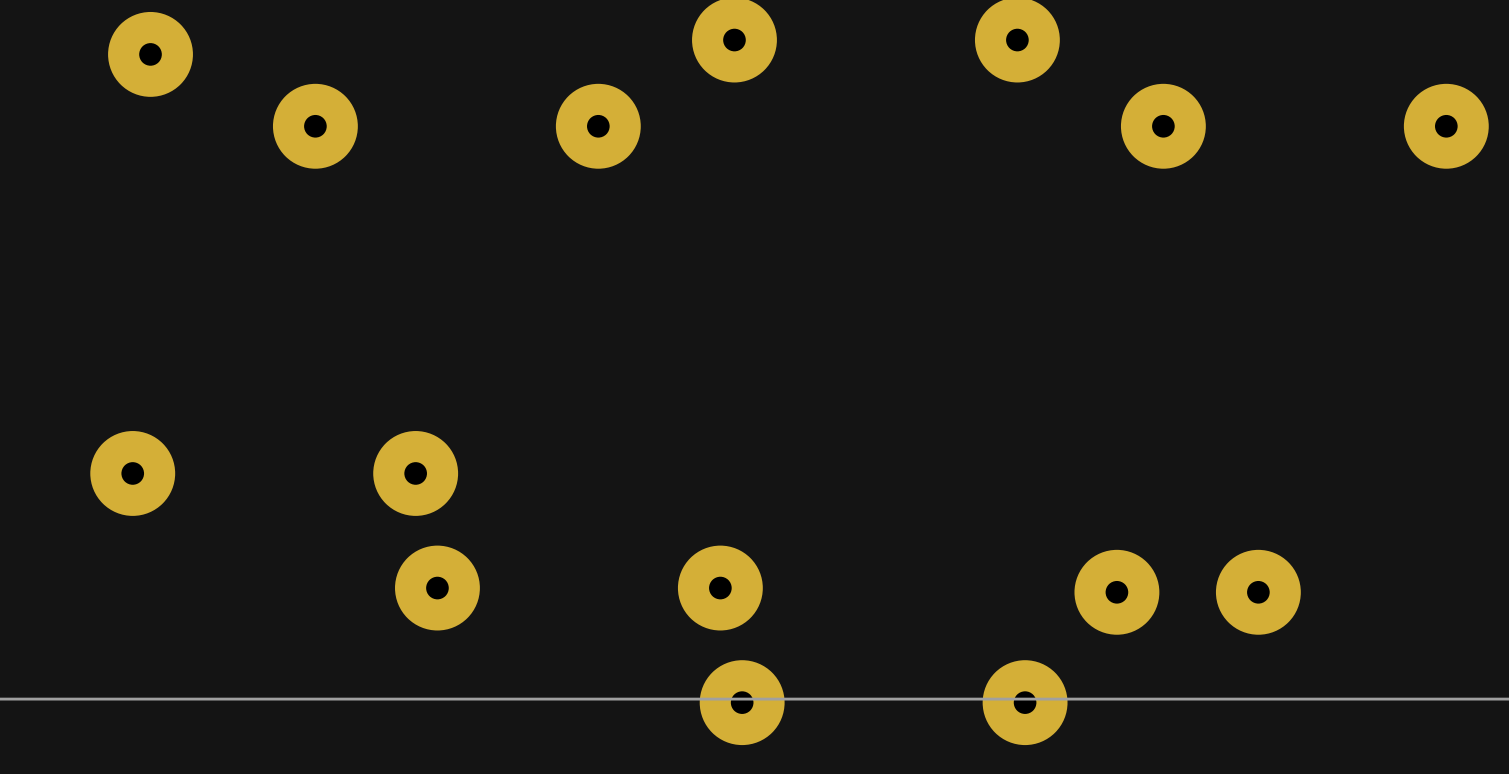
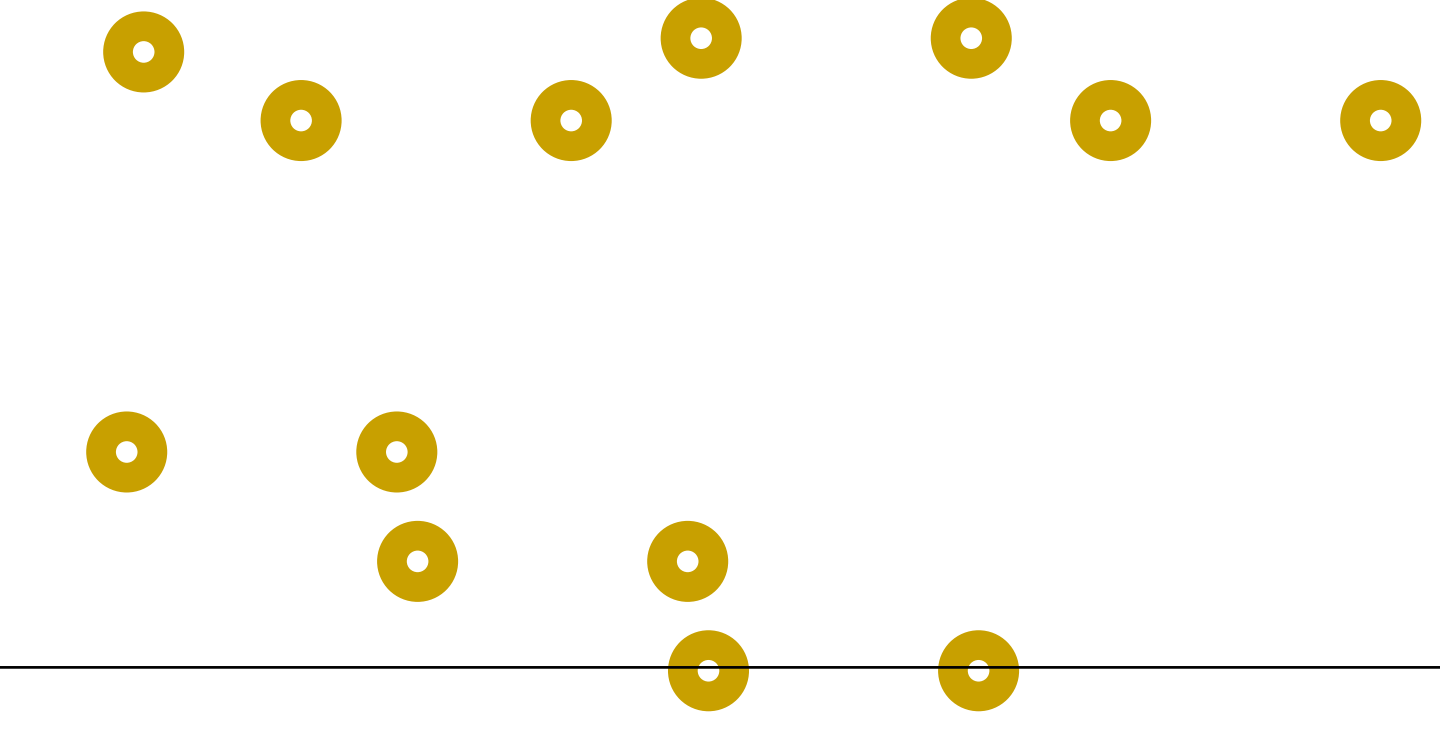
part: (1187, 592) -> none

